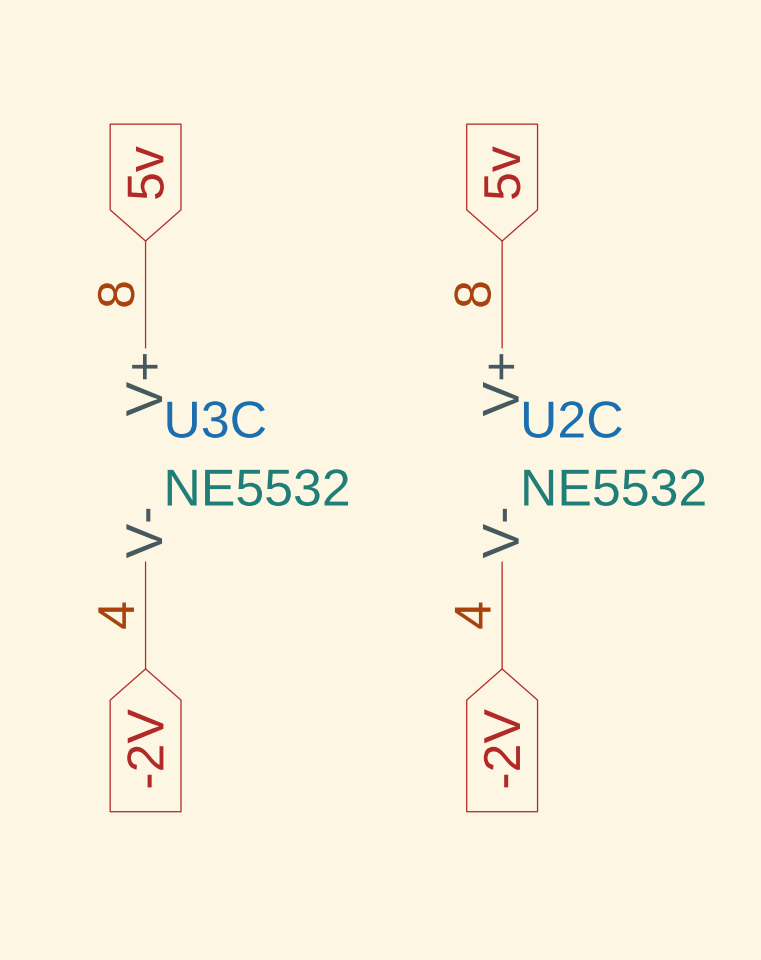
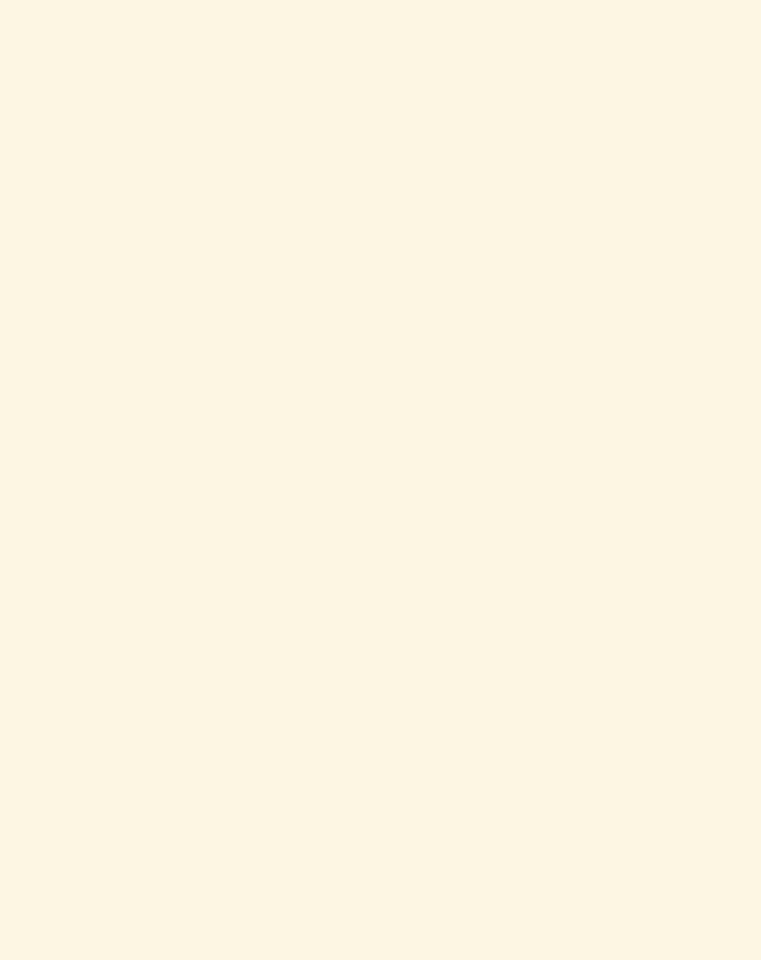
global label: 5v (145, 172) -> none
global label: 5v (502, 172) -> none
U3C: NE5532 (145, 454) -> none
U2C: NE5532 (502, 454) -> none
global label: -2V (145, 748) -> none
global label: -2V (501, 748) -> none

